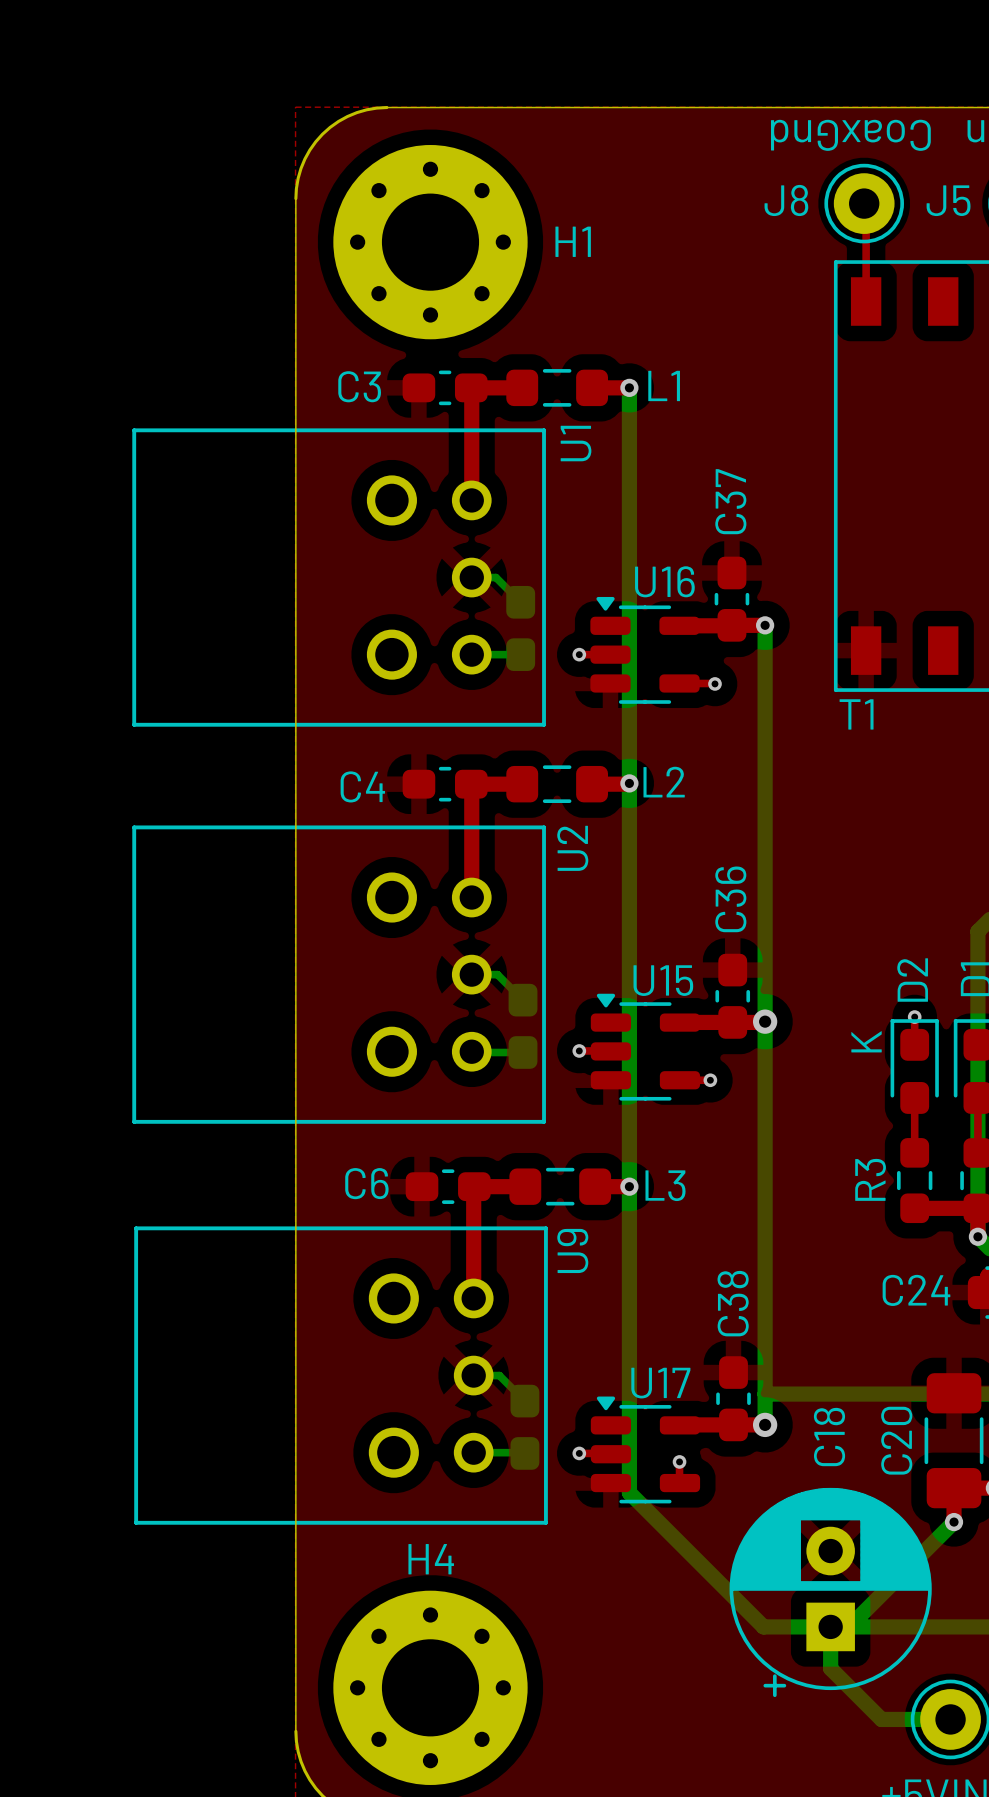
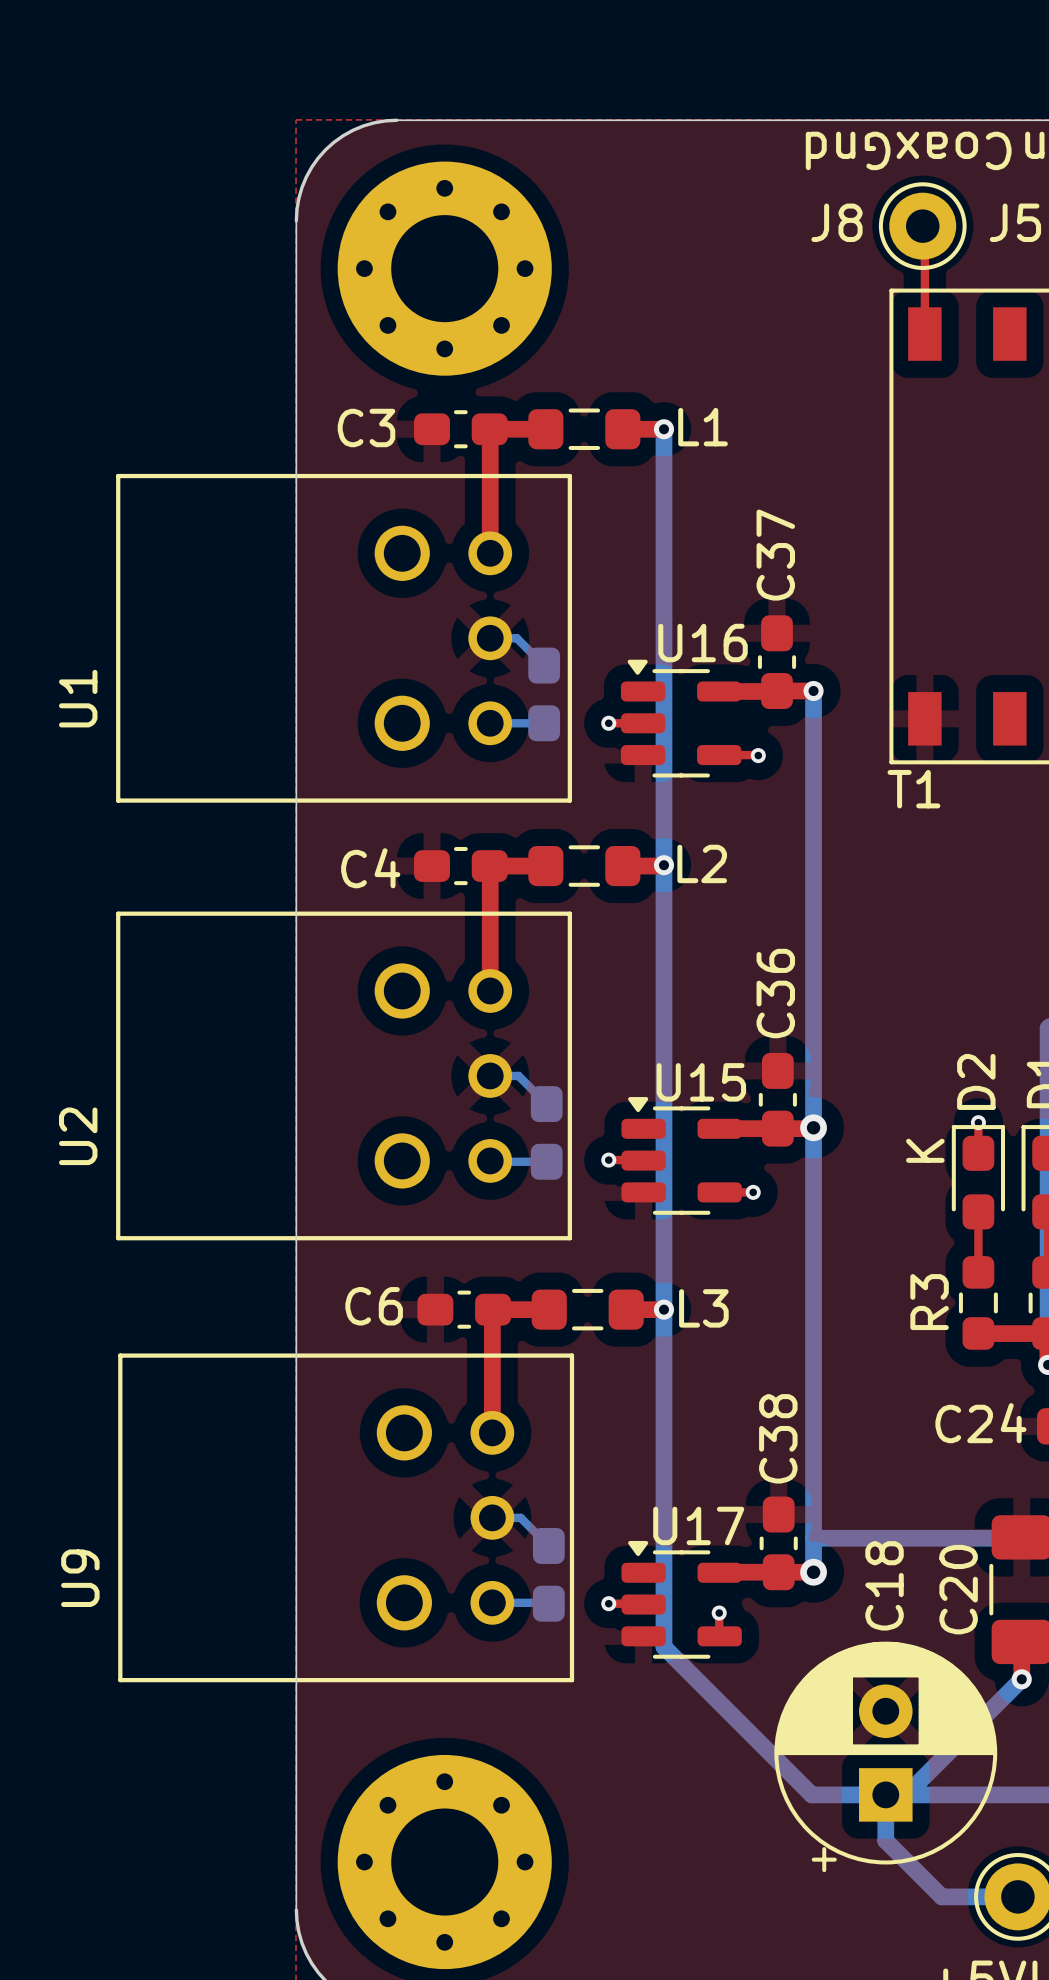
H1 name: H1 (573, 241) -> none
U1 name position: U1 (576, 443) -> U1 (78, 698)
U2 name position: U2 (572, 848) -> U2 (78, 1136)
U9 name position: U9 (572, 1250) -> U9 (80, 1578)
H4 name: H4 (431, 1559) -> none

